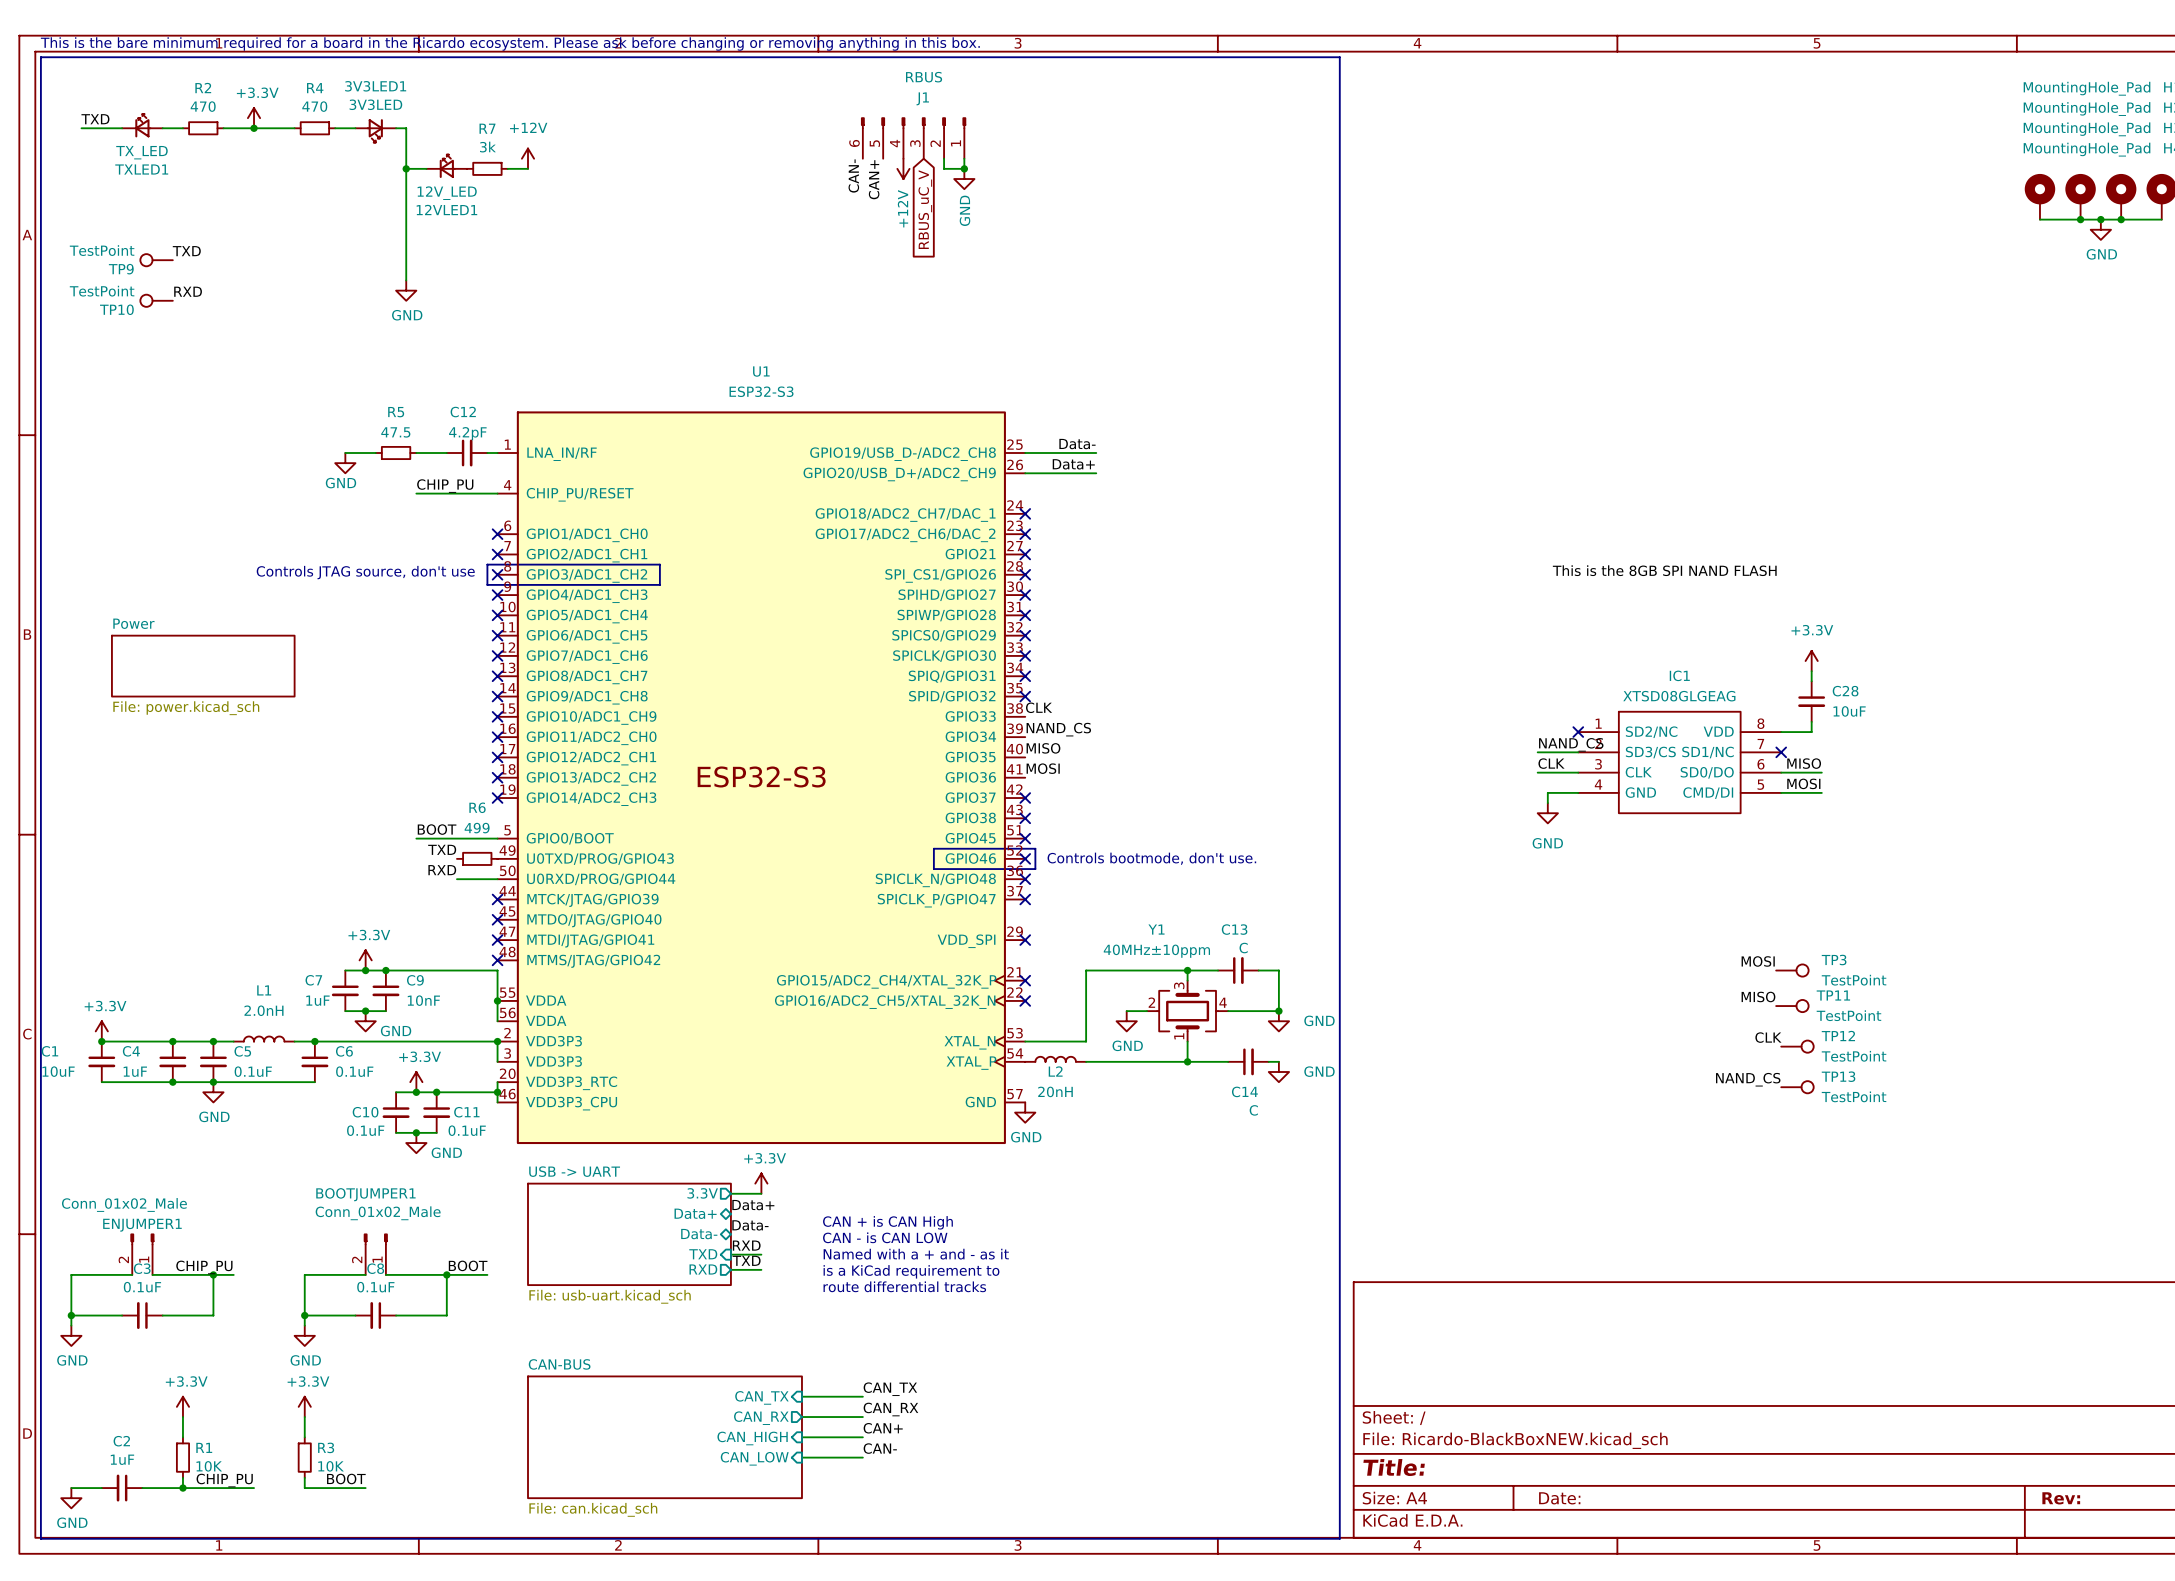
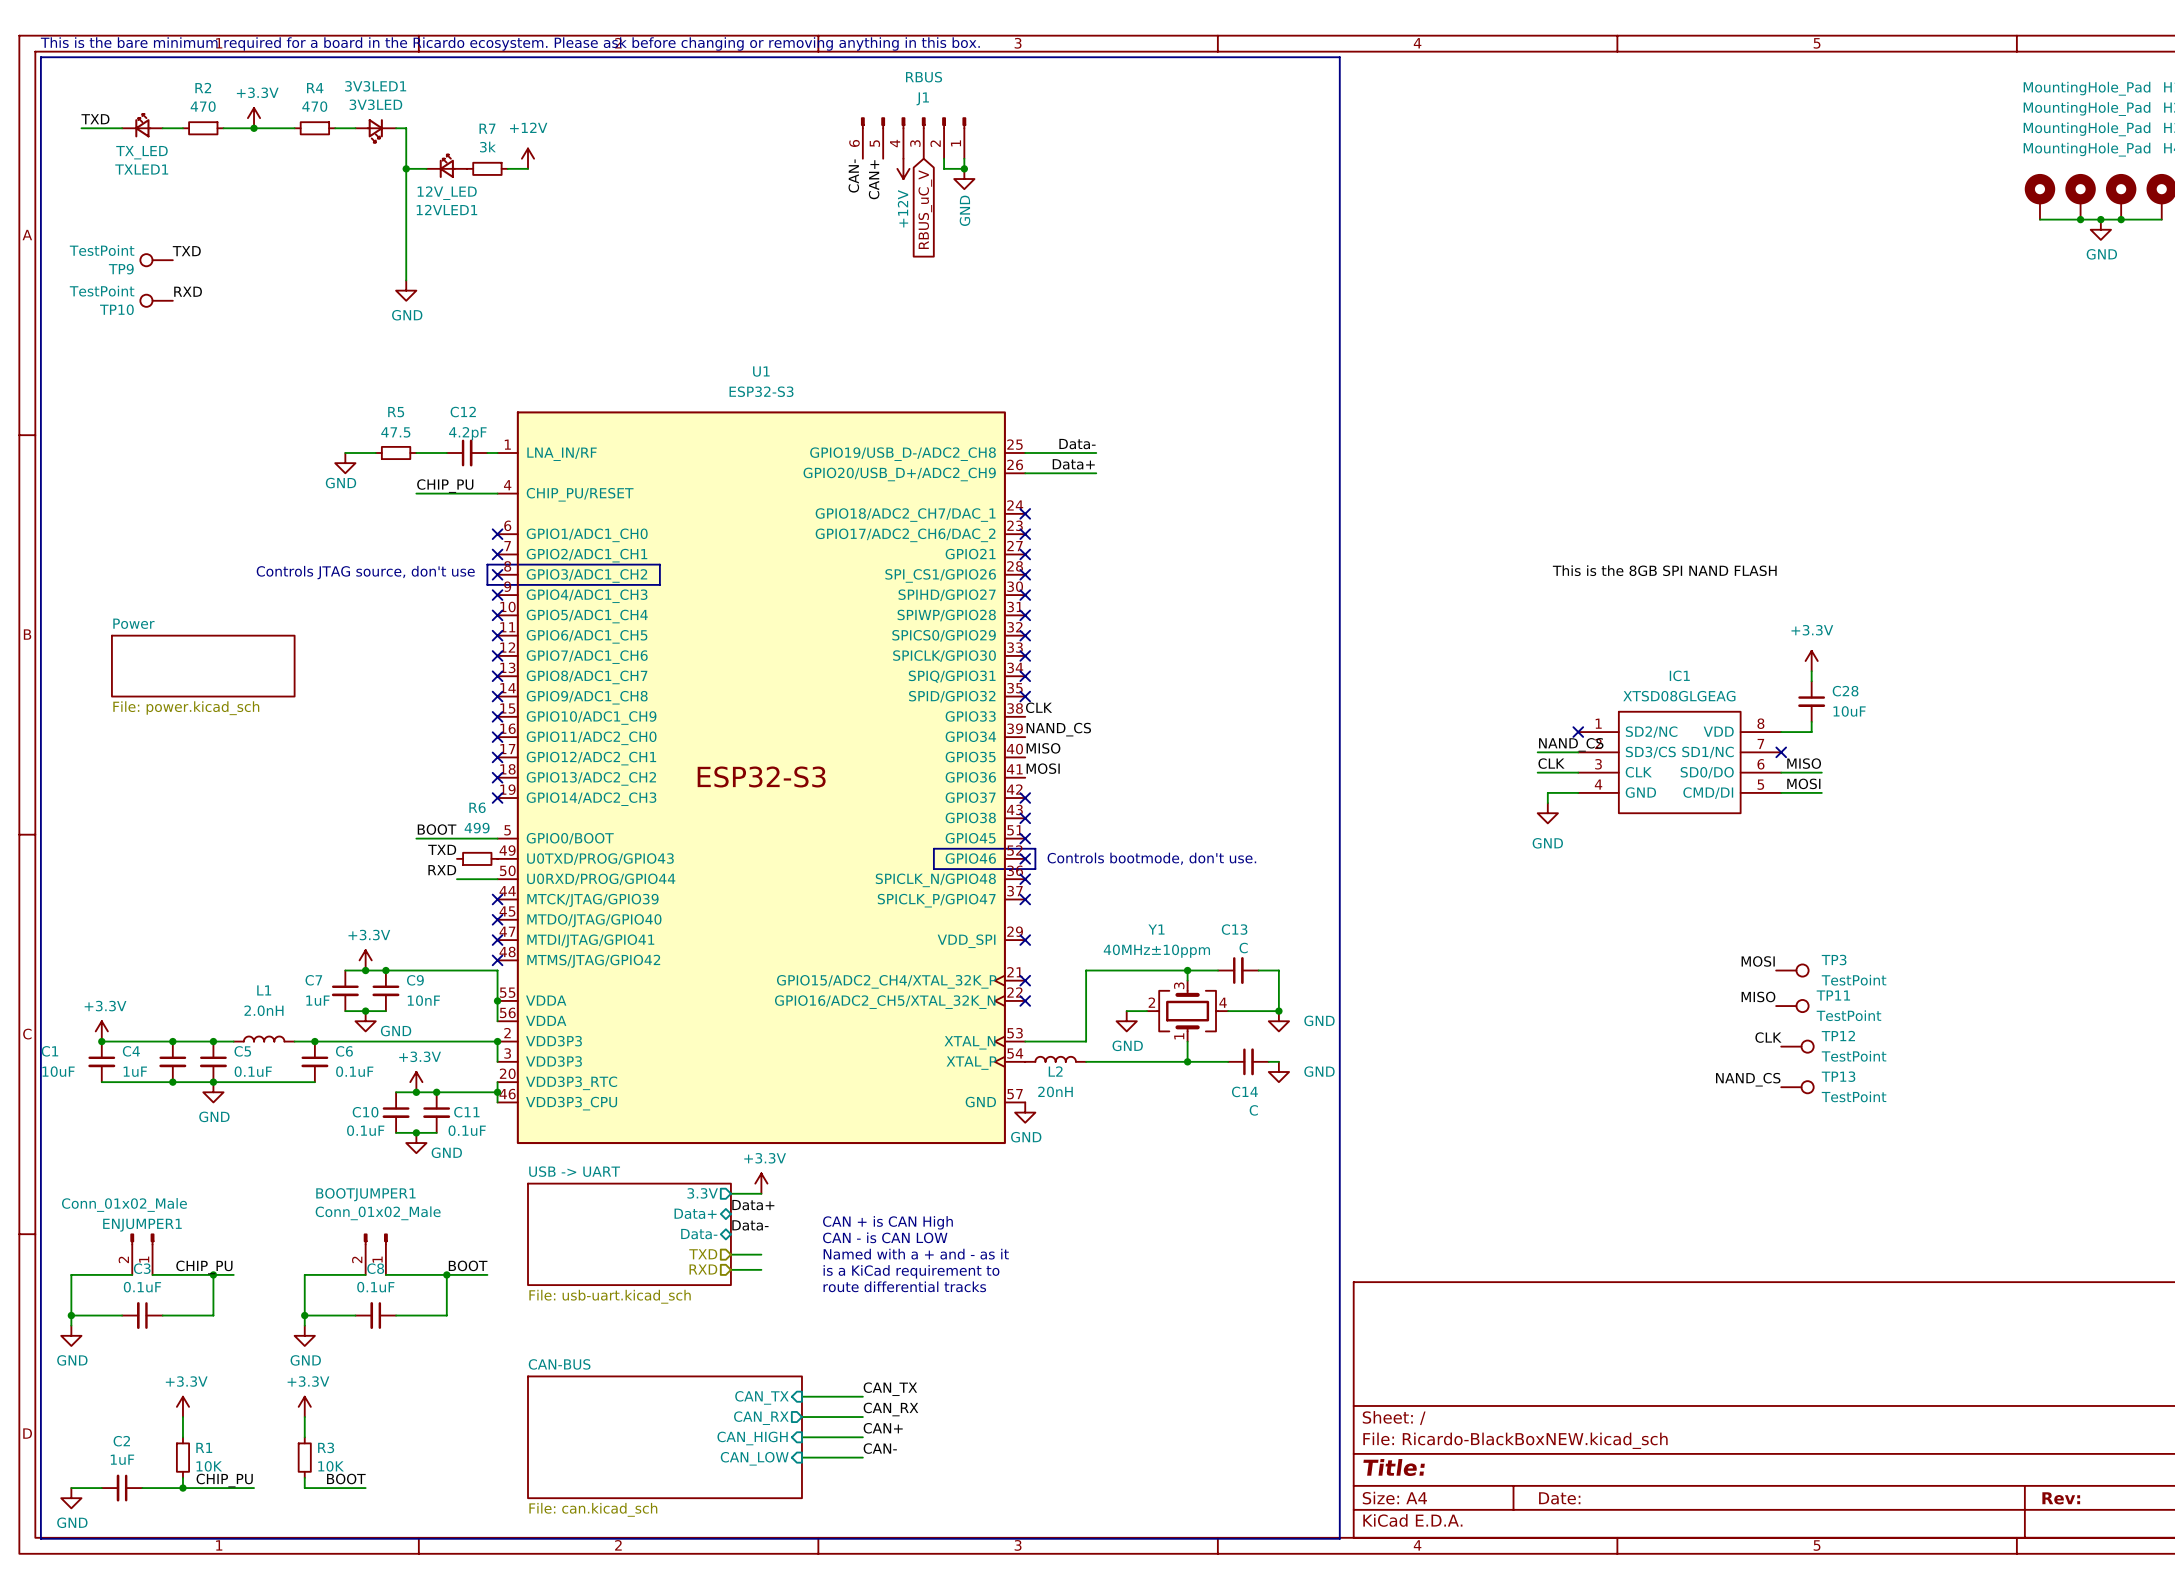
label: RXD (746, 1245) -> none
sheet pin: TXD (703, 1254) -> none
hierarchical label: none -> TXD (703, 1254)
label: TXD (746, 1260) -> none
sheet pin: RXD (703, 1269) -> none
hierarchical label: none -> RXD (703, 1269)

